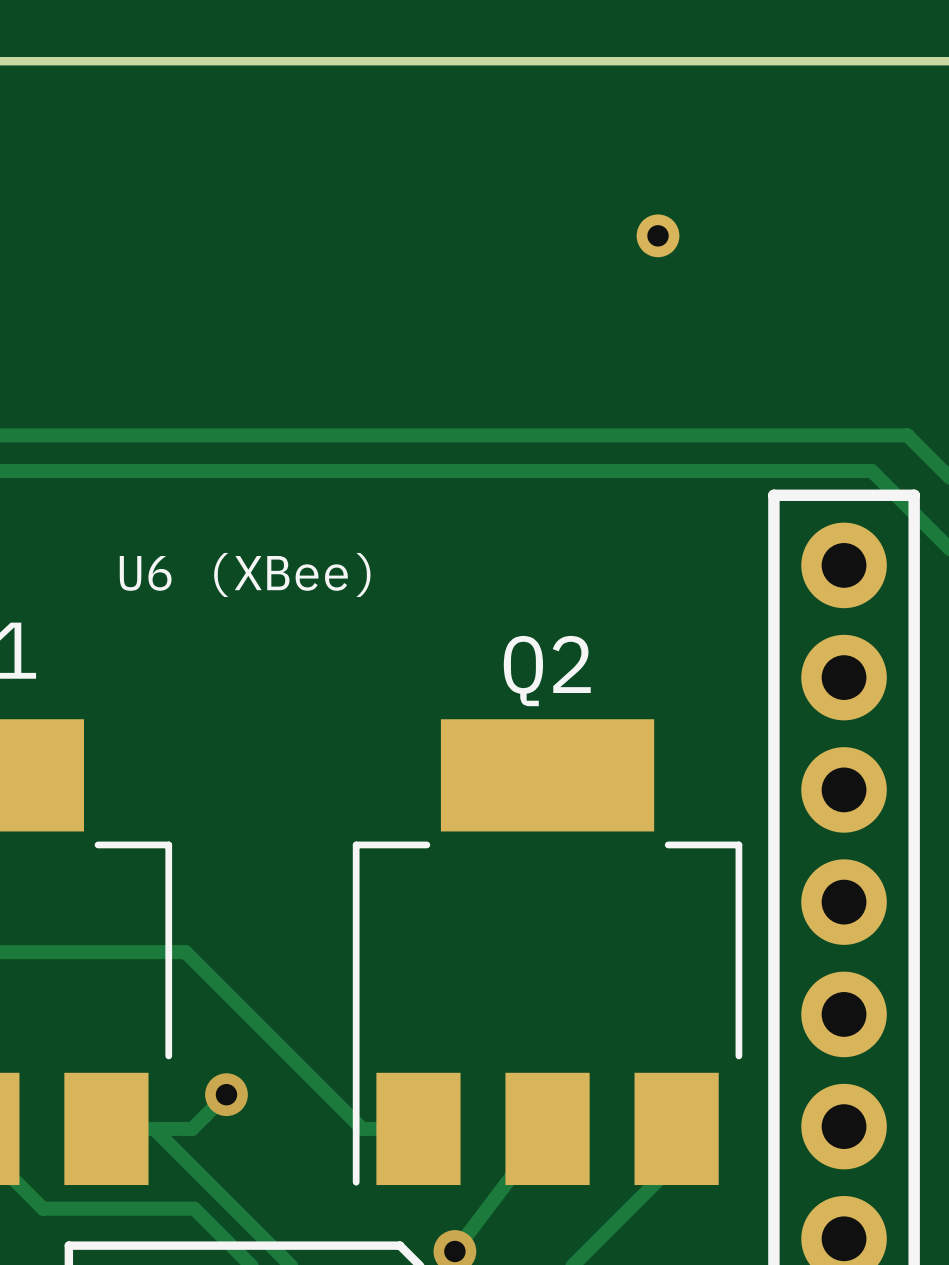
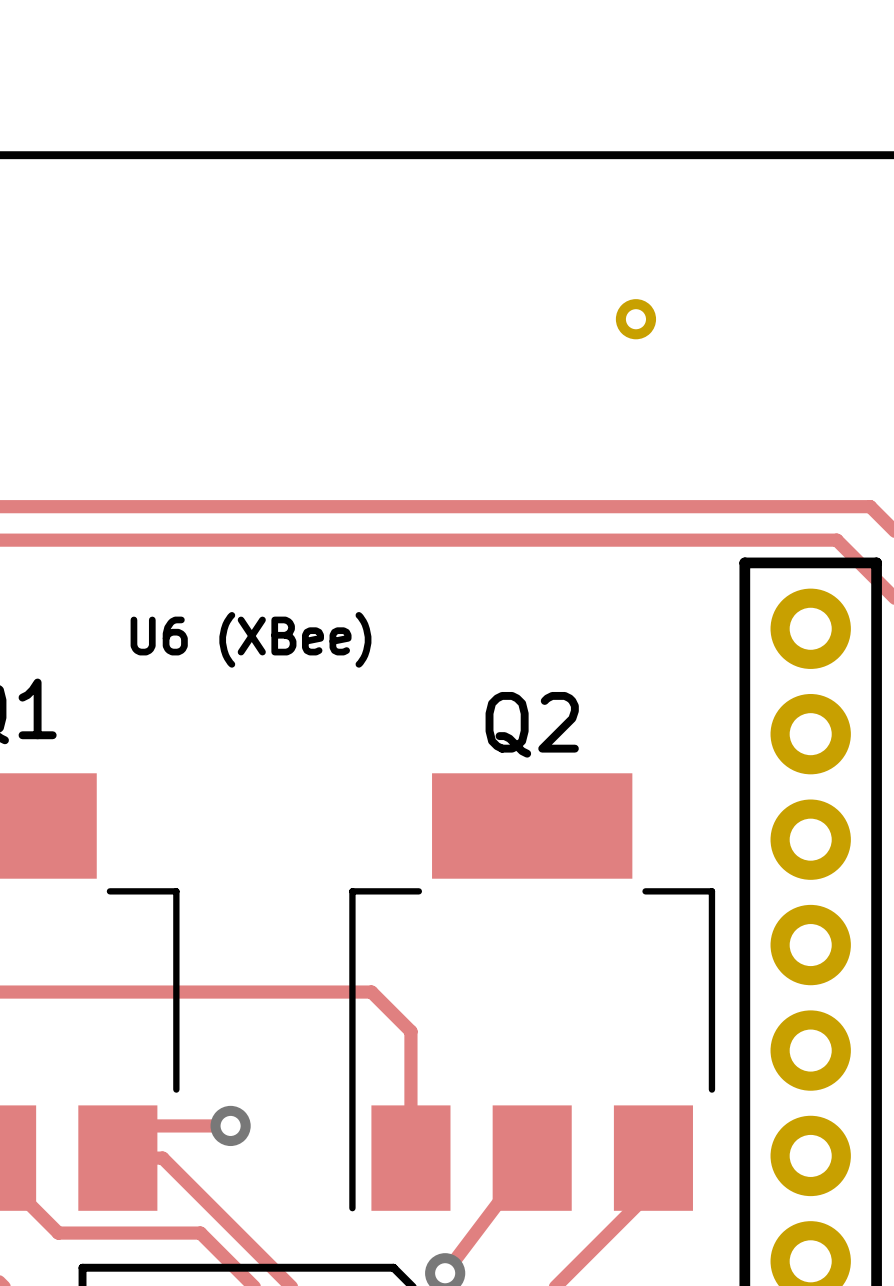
track: (185, 952) (362, 1128) (418, 1128) -> (192, 992) (371, 992) (410, 1031) (410, 1158)
track: (226, 1094) (192, 1128) (154, 1128) -> (230, 1125) (150, 1125) (117, 1158)

